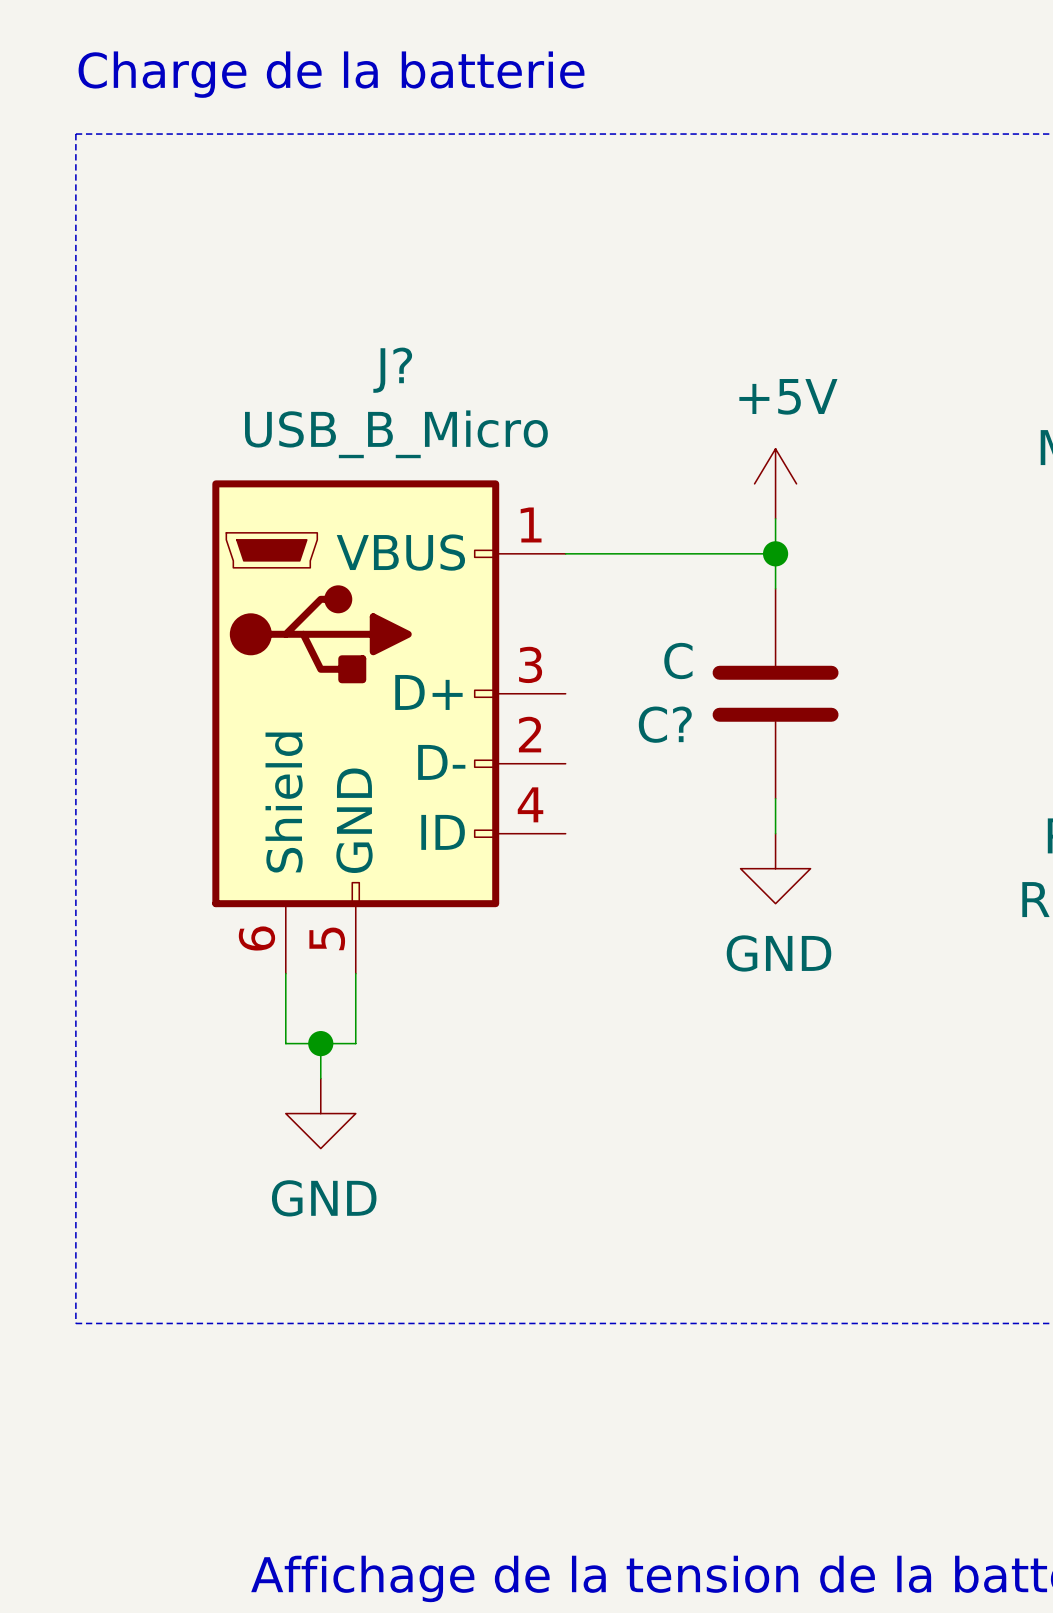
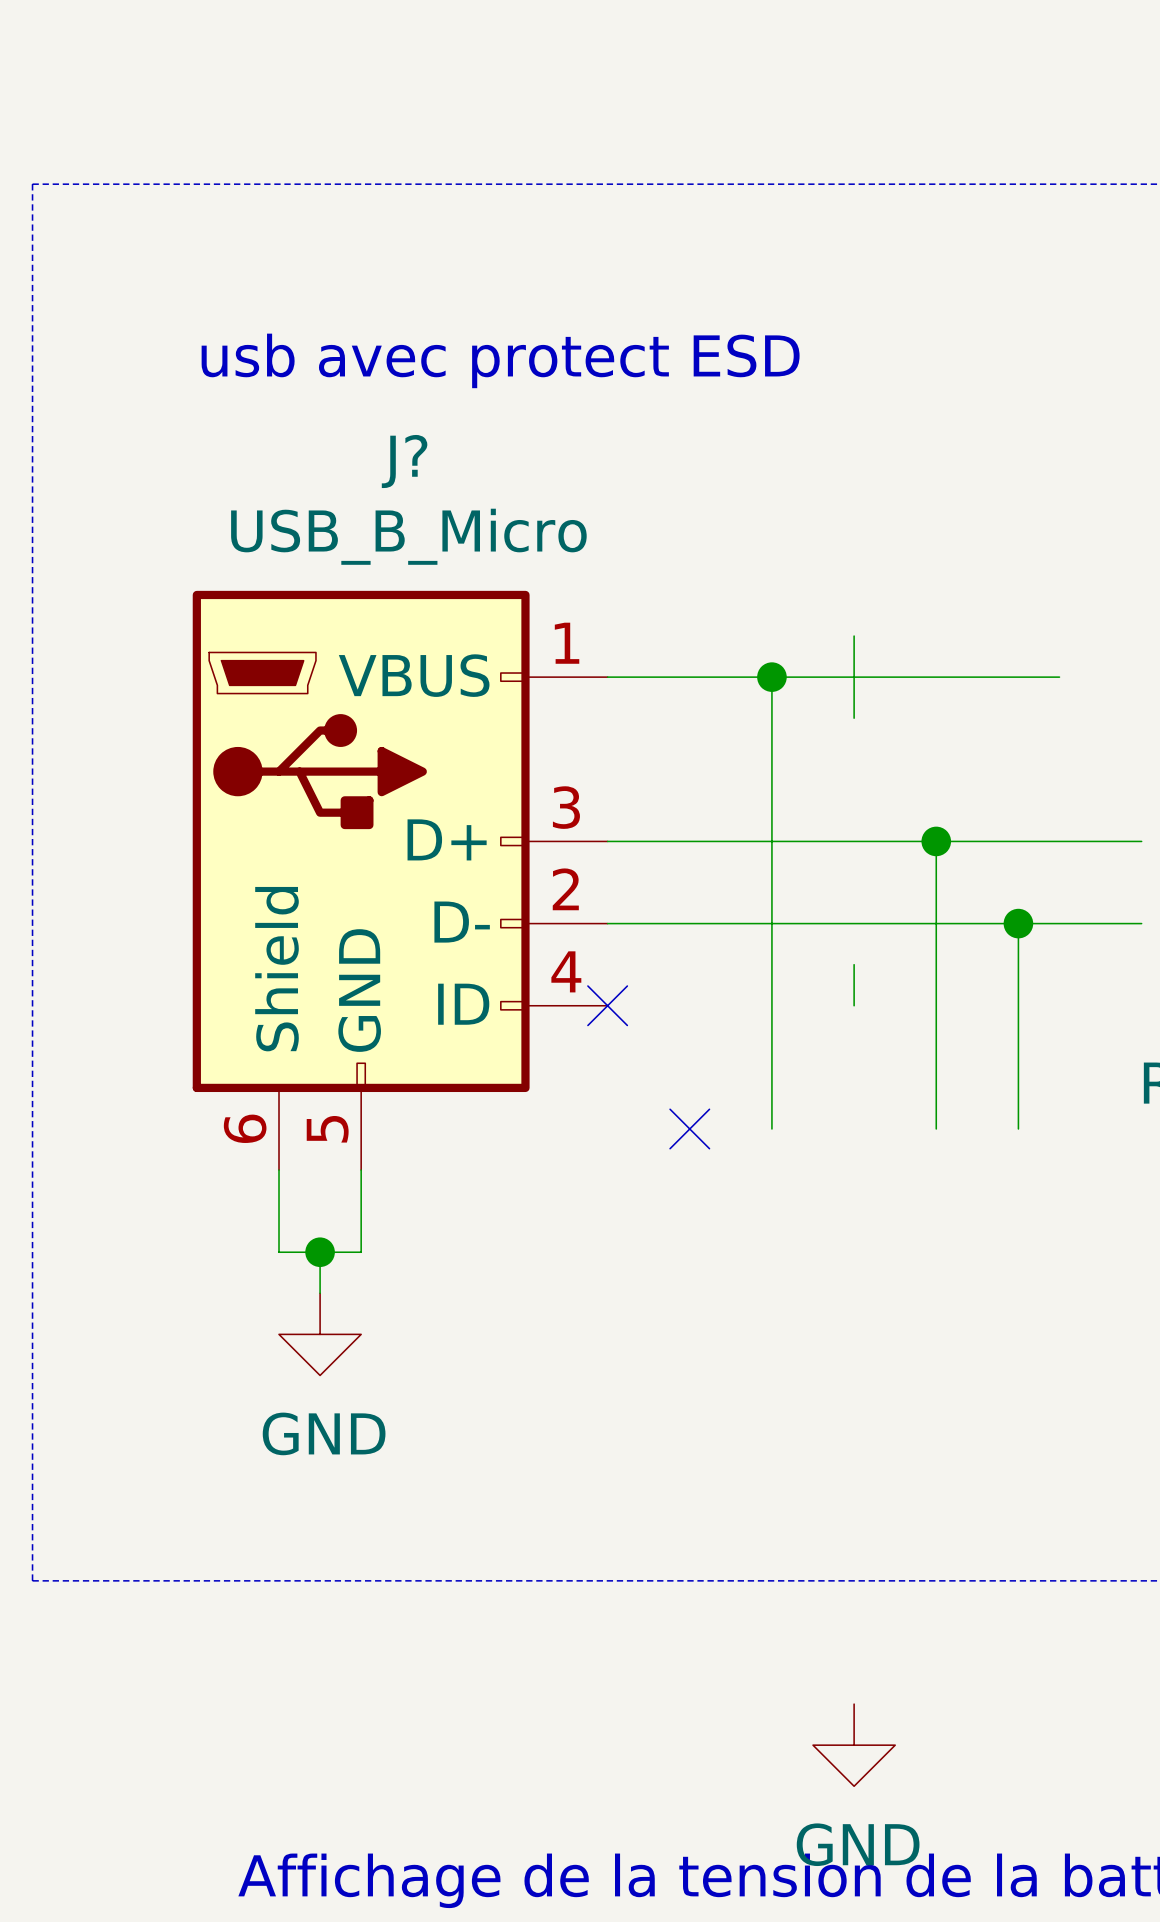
text: Charge de la batterie (331, 74) -> none
text: none -> usb avec protect ESD (500, 360)
power symbol: +5V (775, 483) -> none
wire: none -> (771, 677) (771, 1128)
wire: none -> (854, 677) (1059, 677)
junction position: (775, 553) -> (771, 677)
wire: none -> (607, 841) (1141, 841)
C?: C (775, 693) -> none
wire: none -> (936, 841) (936, 1128)
junction: none -> (936, 841)
wire: none -> (607, 923) (1141, 923)
wire: none -> (1018, 923) (1018, 1128)
junction: none -> (1018, 923)
no-connect mark: none -> (607, 1005)
power symbol: GND (775, 868) -> none
no-connect mark: none -> (689, 1128)
power symbol: none -> GND (854, 1745)

